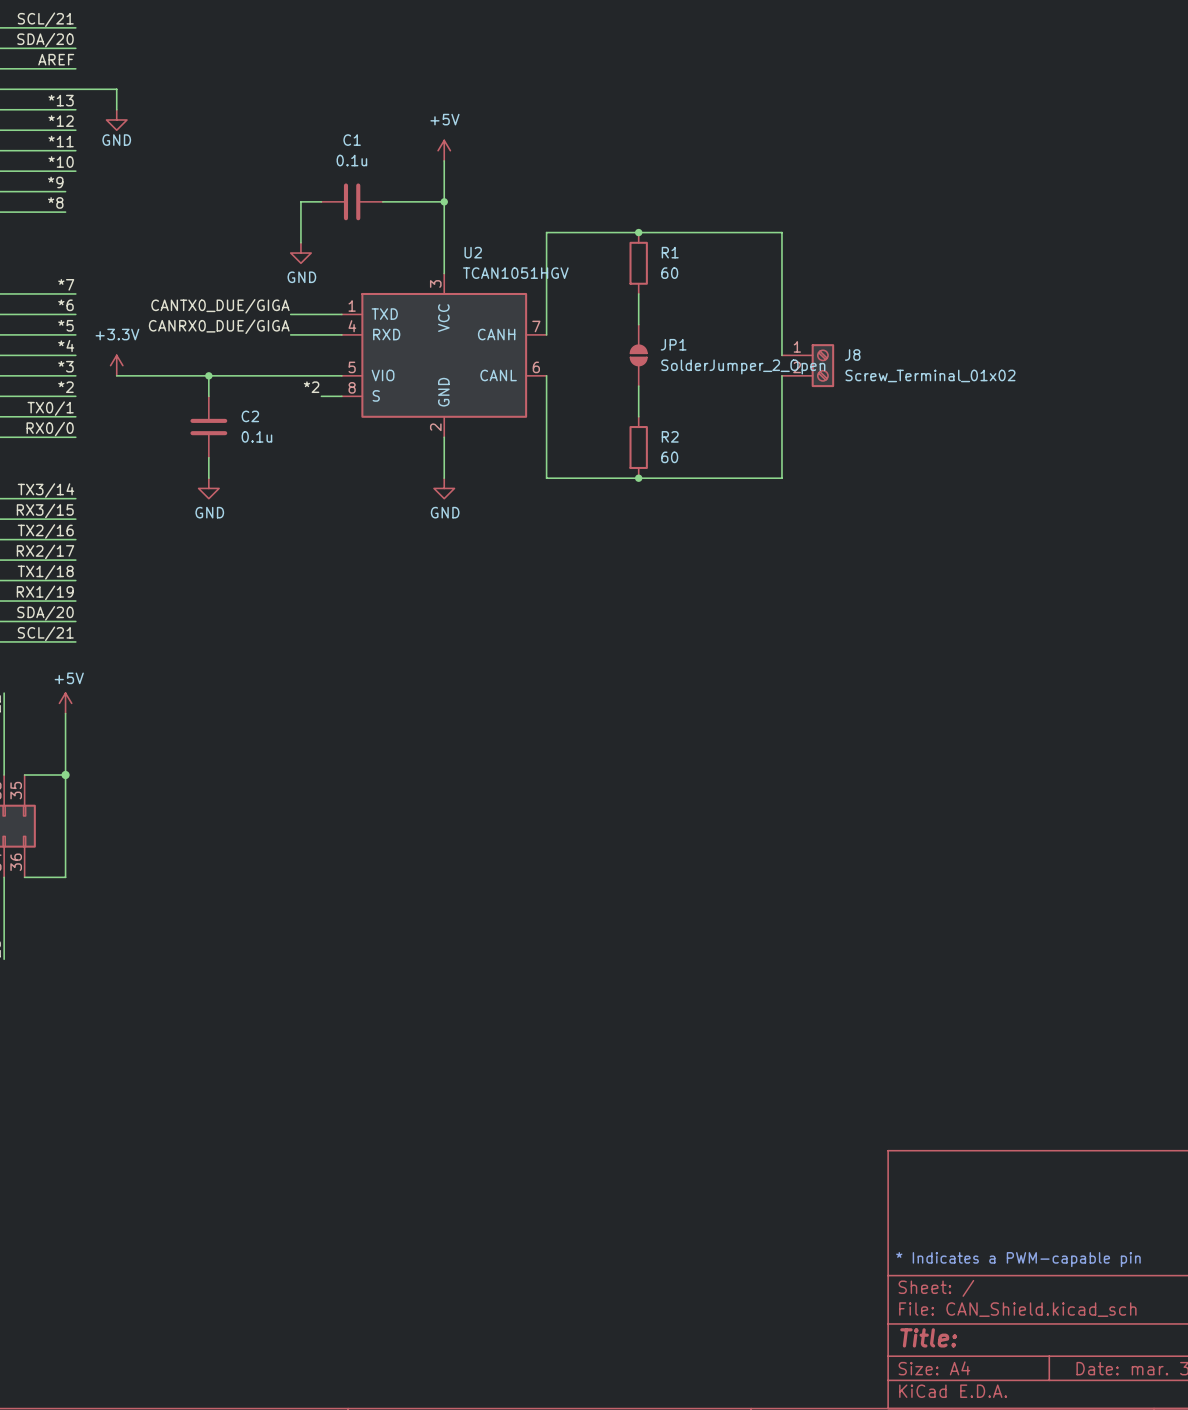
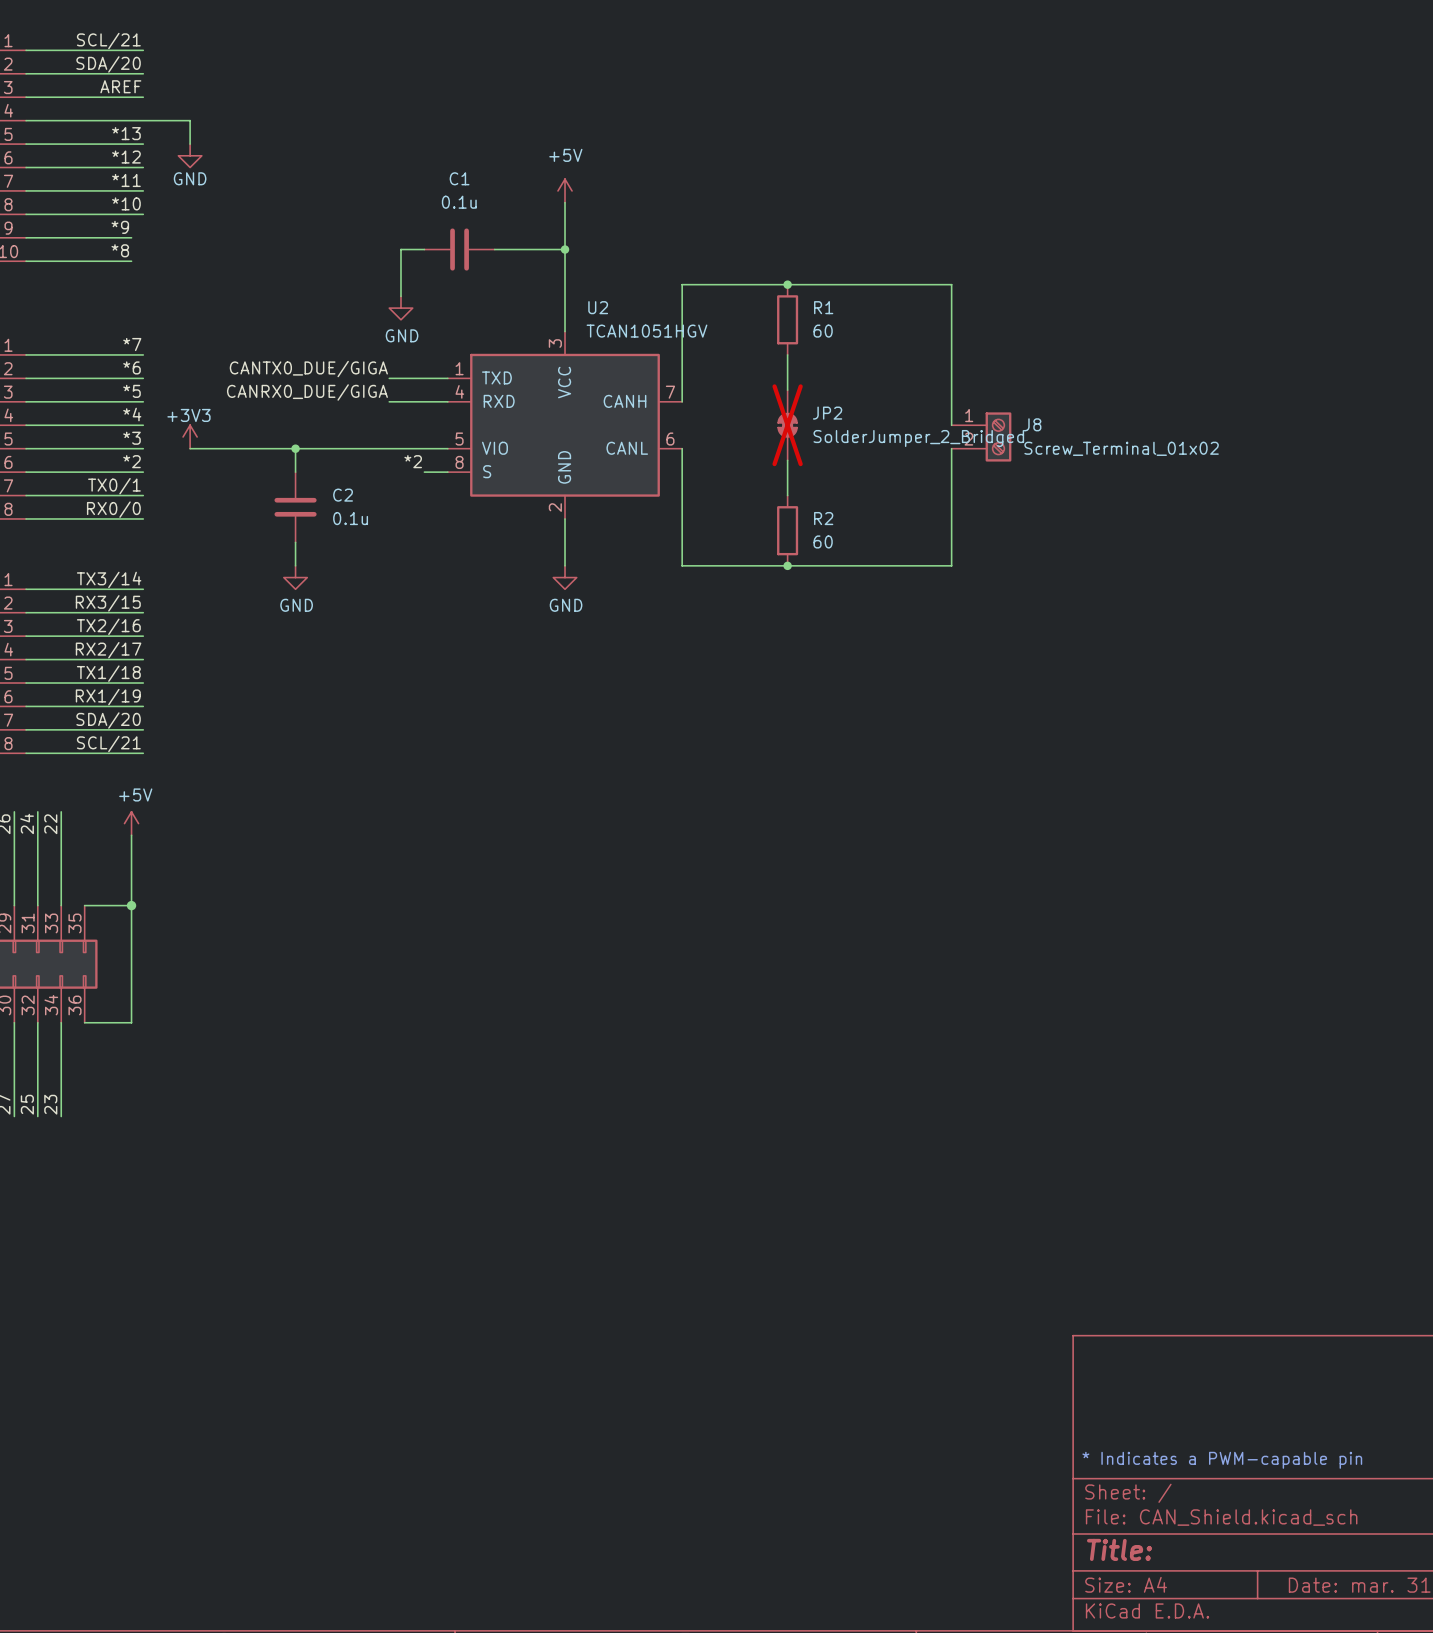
JP1: SolderJumper_2_Open (638, 355) -> none
JP2: none -> SolderJumper_2_Bridged (787, 425)
power symbol: +3.3V (116, 365) -> +3V3 (190, 436)

